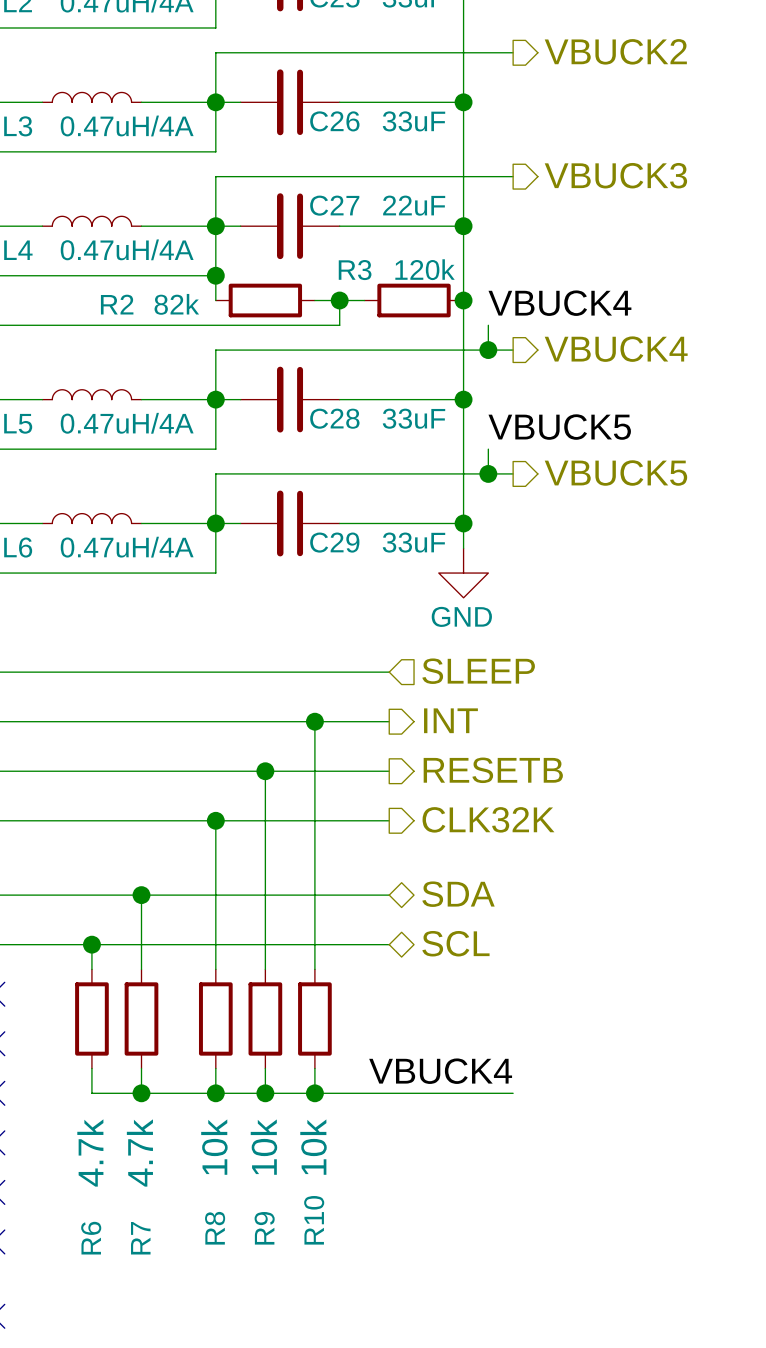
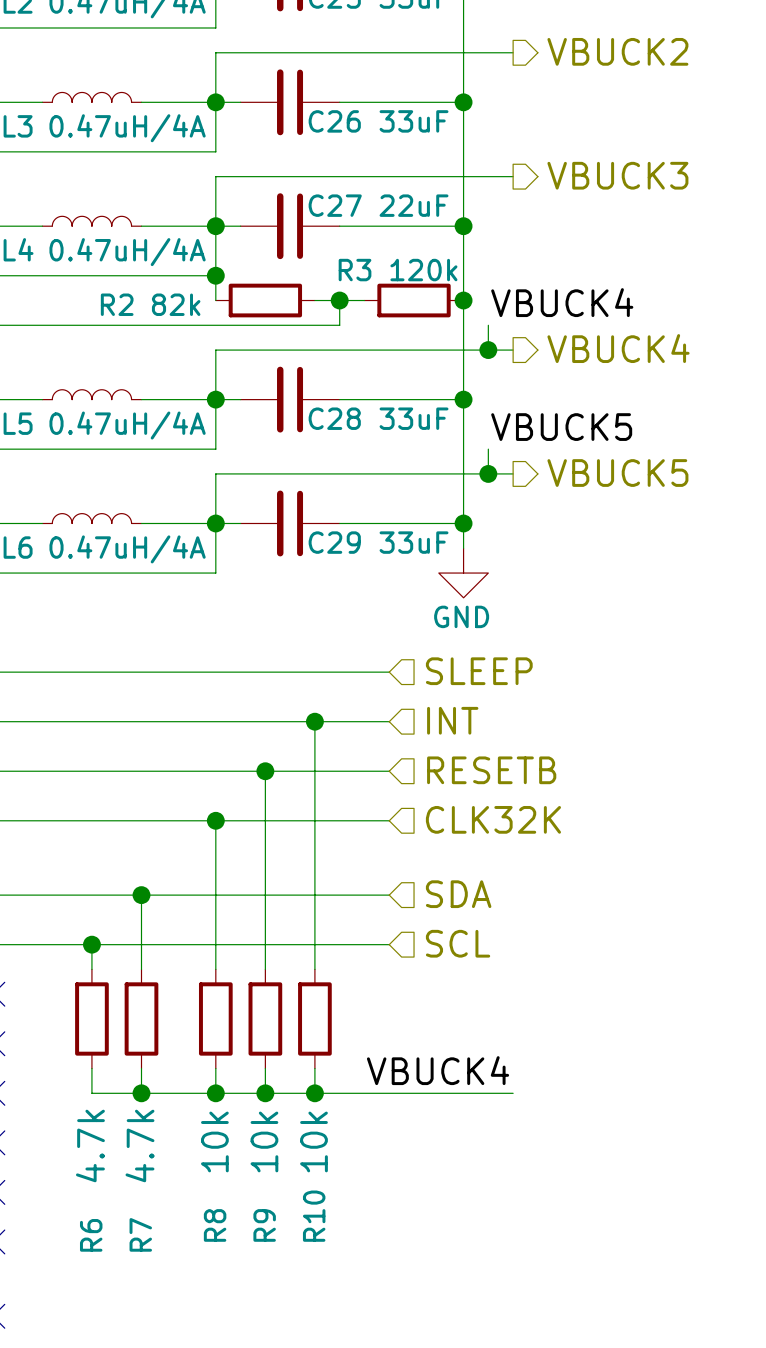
hierarchical label shape: output (450, 720) -> input (452, 720)
hierarchical label shape: output (493, 770) -> input (491, 770)
hierarchical label shape: output (488, 819) -> input (493, 819)
hierarchical label shape: bidirectional (458, 894) -> input (458, 894)
hierarchical label shape: bidirectional (455, 943) -> input (458, 943)

